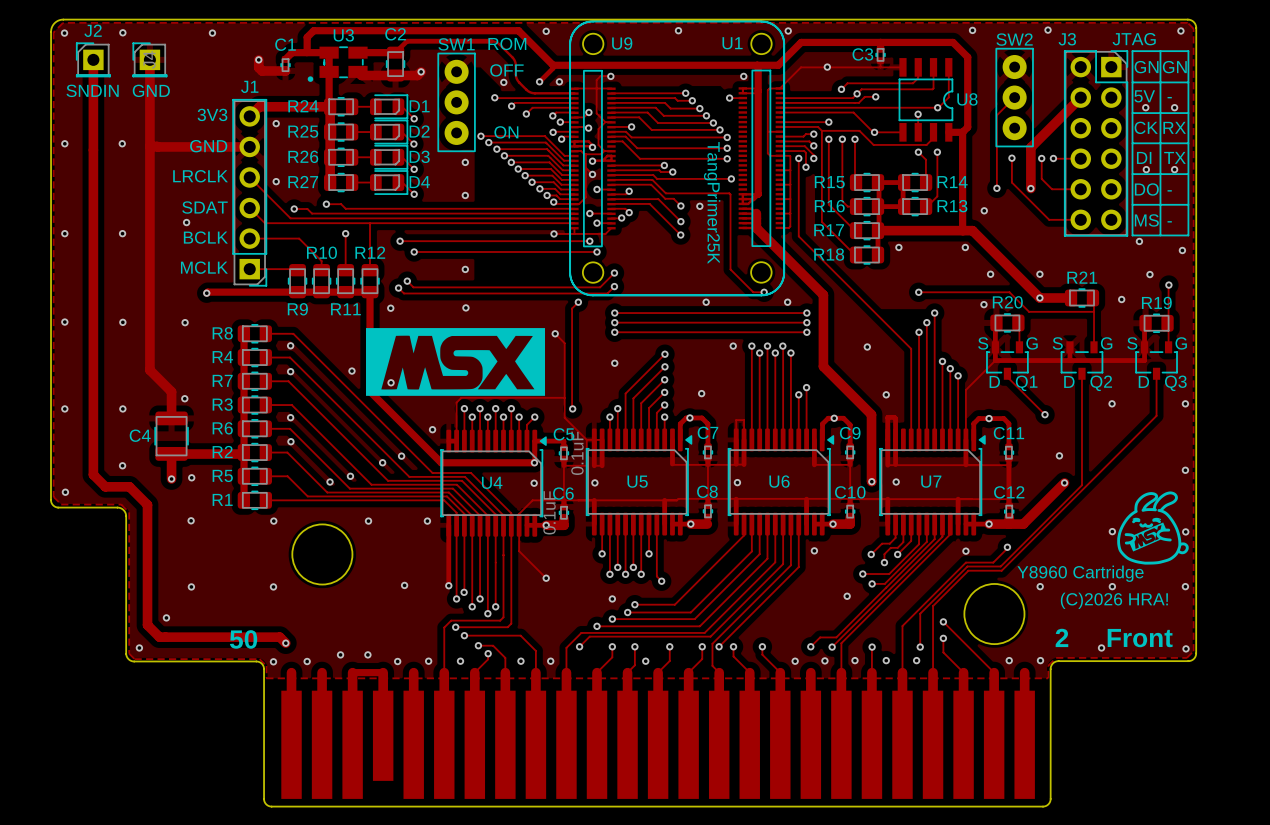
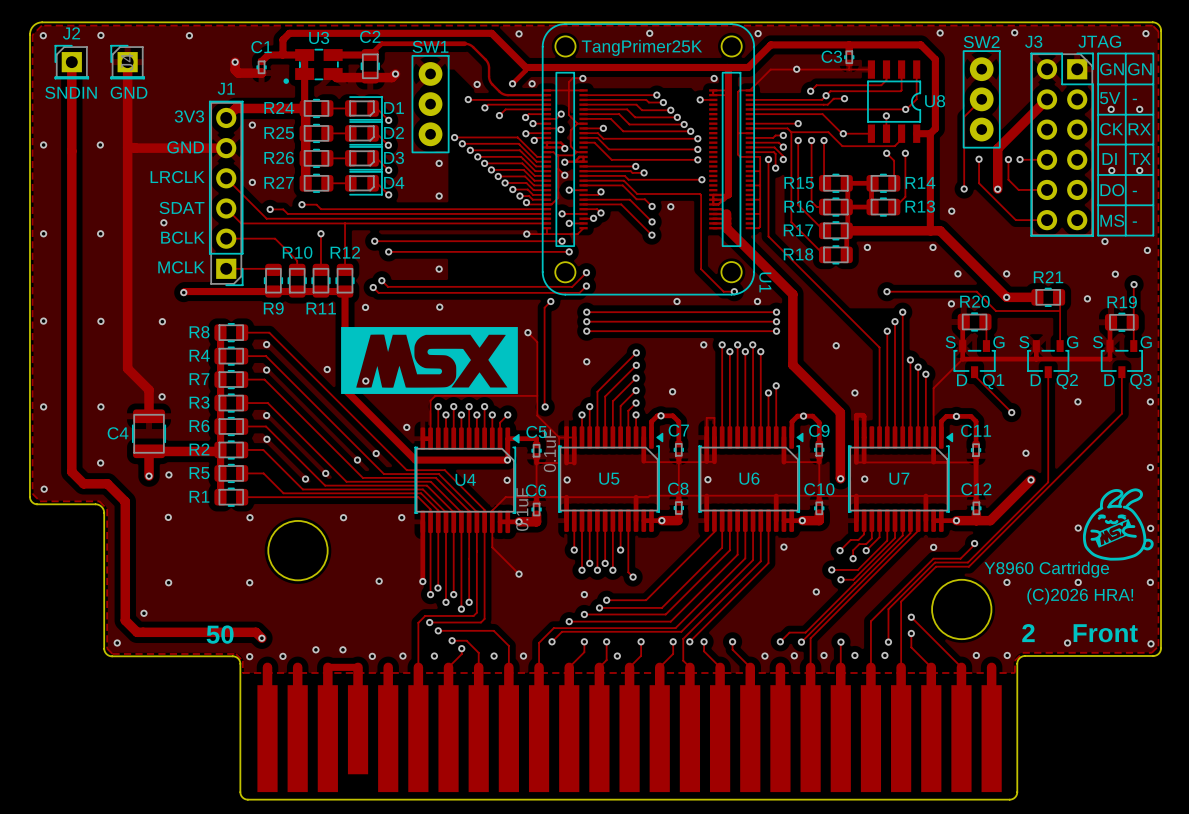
U1 footprint: [569, 20, 785, 296] -> [542, 23, 755, 296]
text: ROM (507, 43) -> none
U1 name position: U1 (732, 43) -> U1 (765, 282)
text: OFF (506, 70) -> none
text: ON (506, 132) -> none
U9: (677, 158) -> none
text: TangPrimer25K (712, 202) -> none

